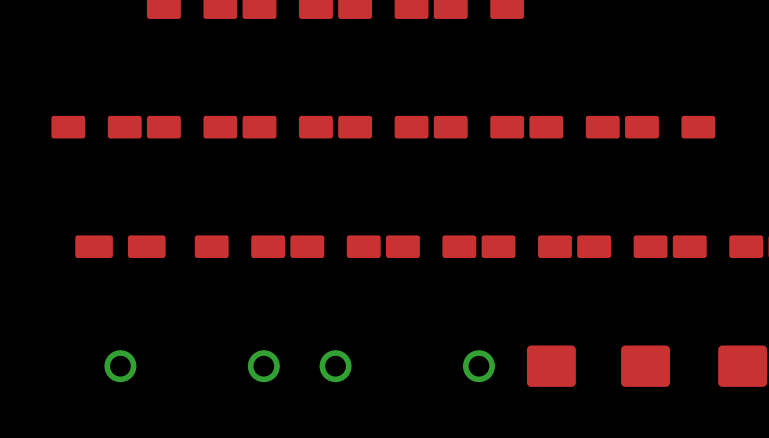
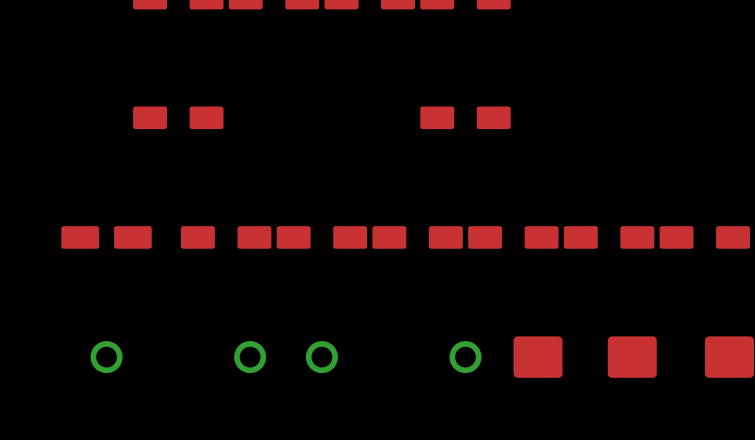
part: (96, 127) -> none
part: (287, 127) -> none
part: (383, 127) -> none
part: (574, 127) -> none
part: (670, 127) -> none

